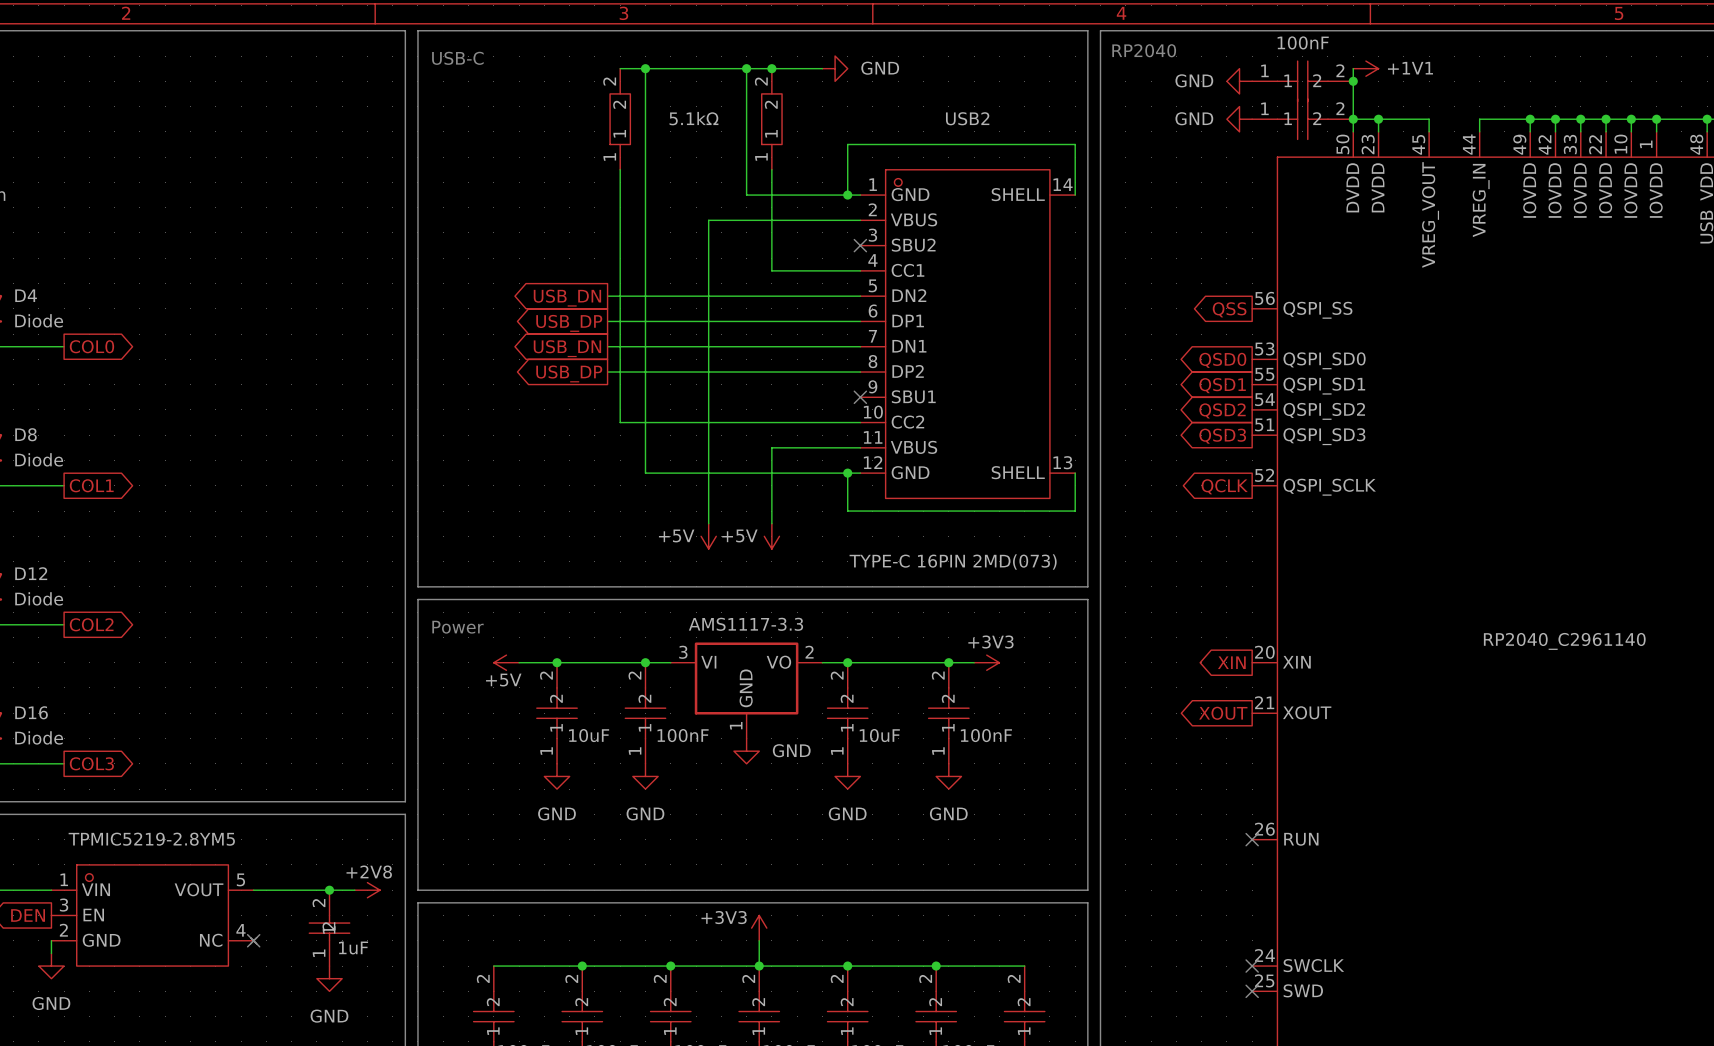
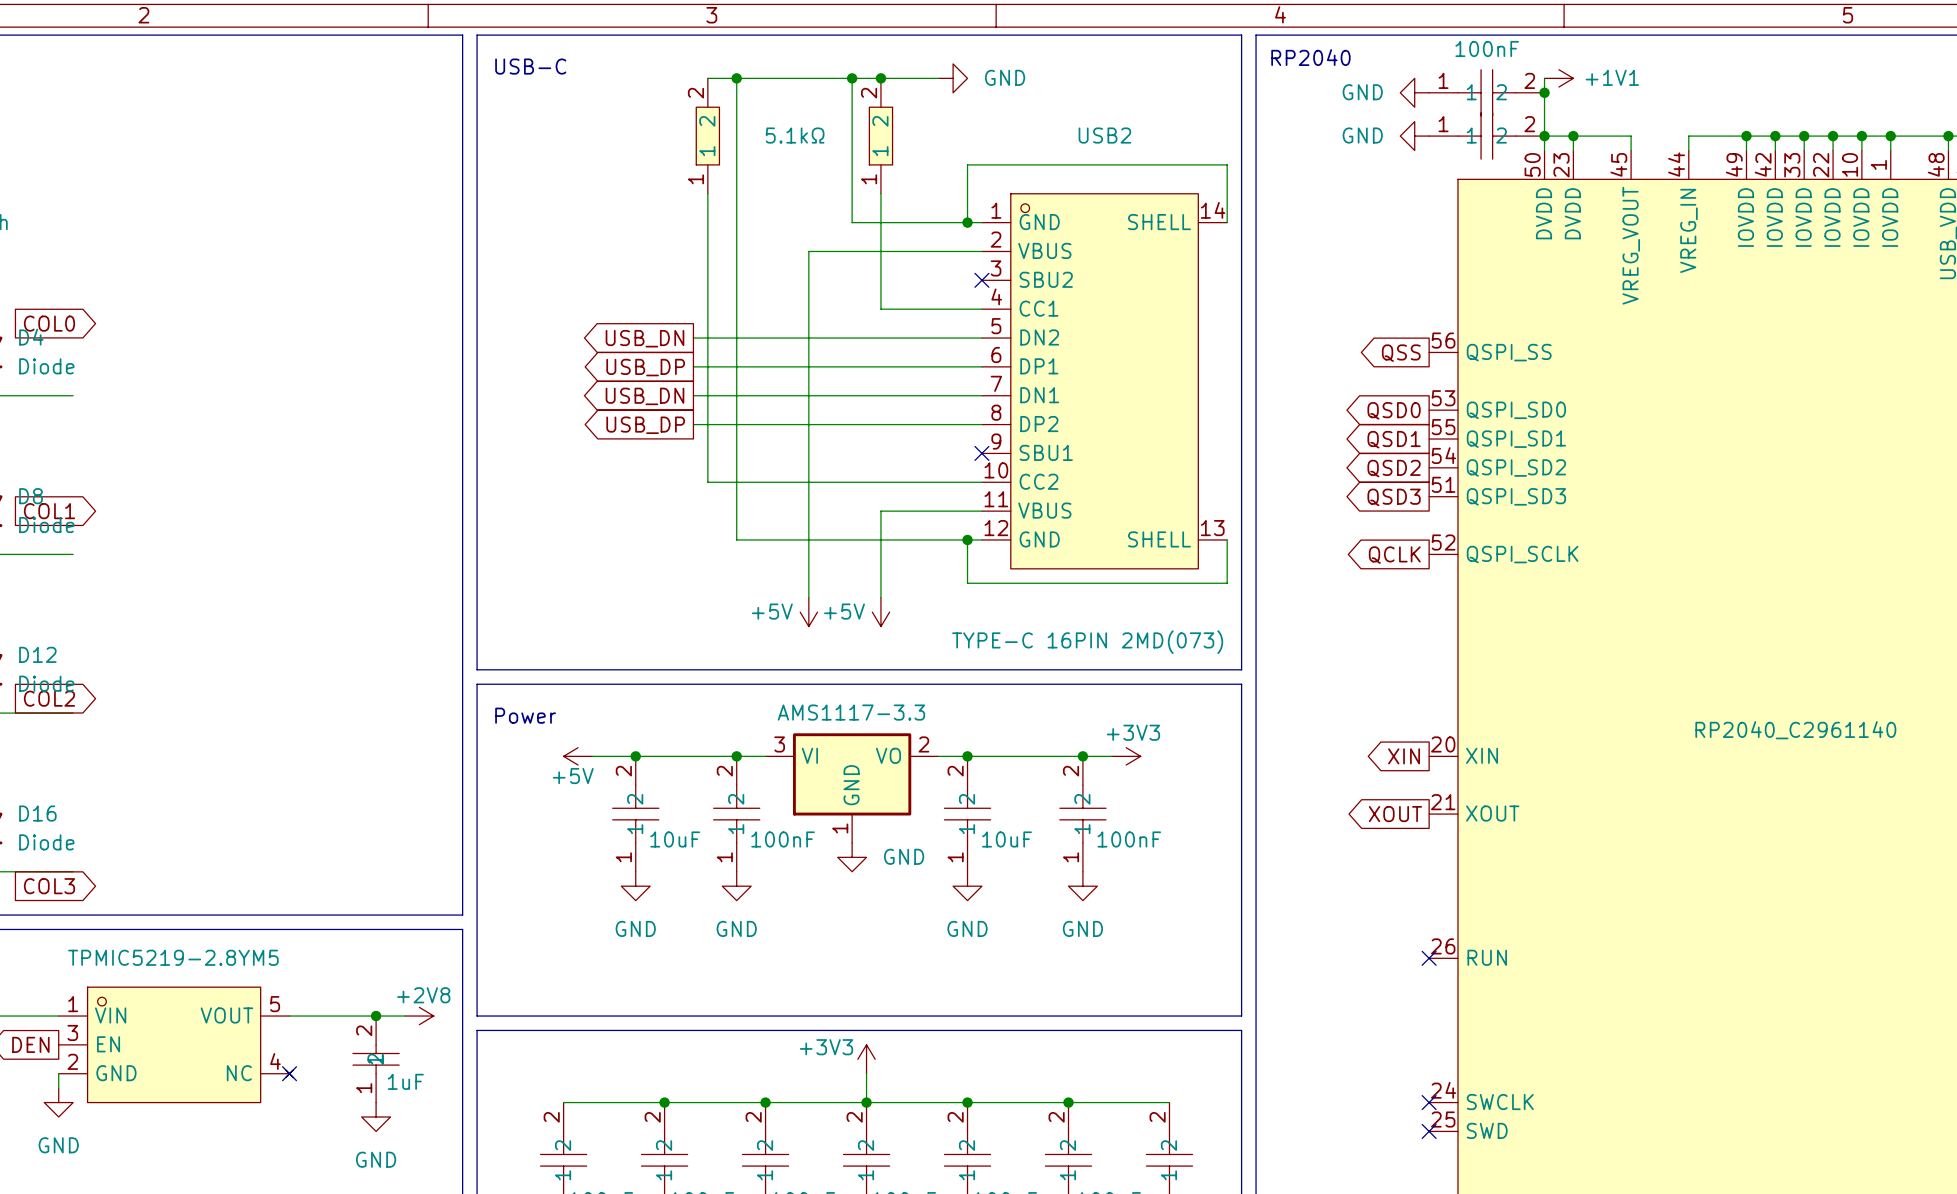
global label position: COL0 (91, 346) -> COL0 (49, 323)
global label position: COL1 (91, 485) -> COL1 (49, 511)
global label position: COL2 (91, 624) -> COL2 (49, 698)
global label position: COL3 (91, 763) -> COL3 (49, 886)

